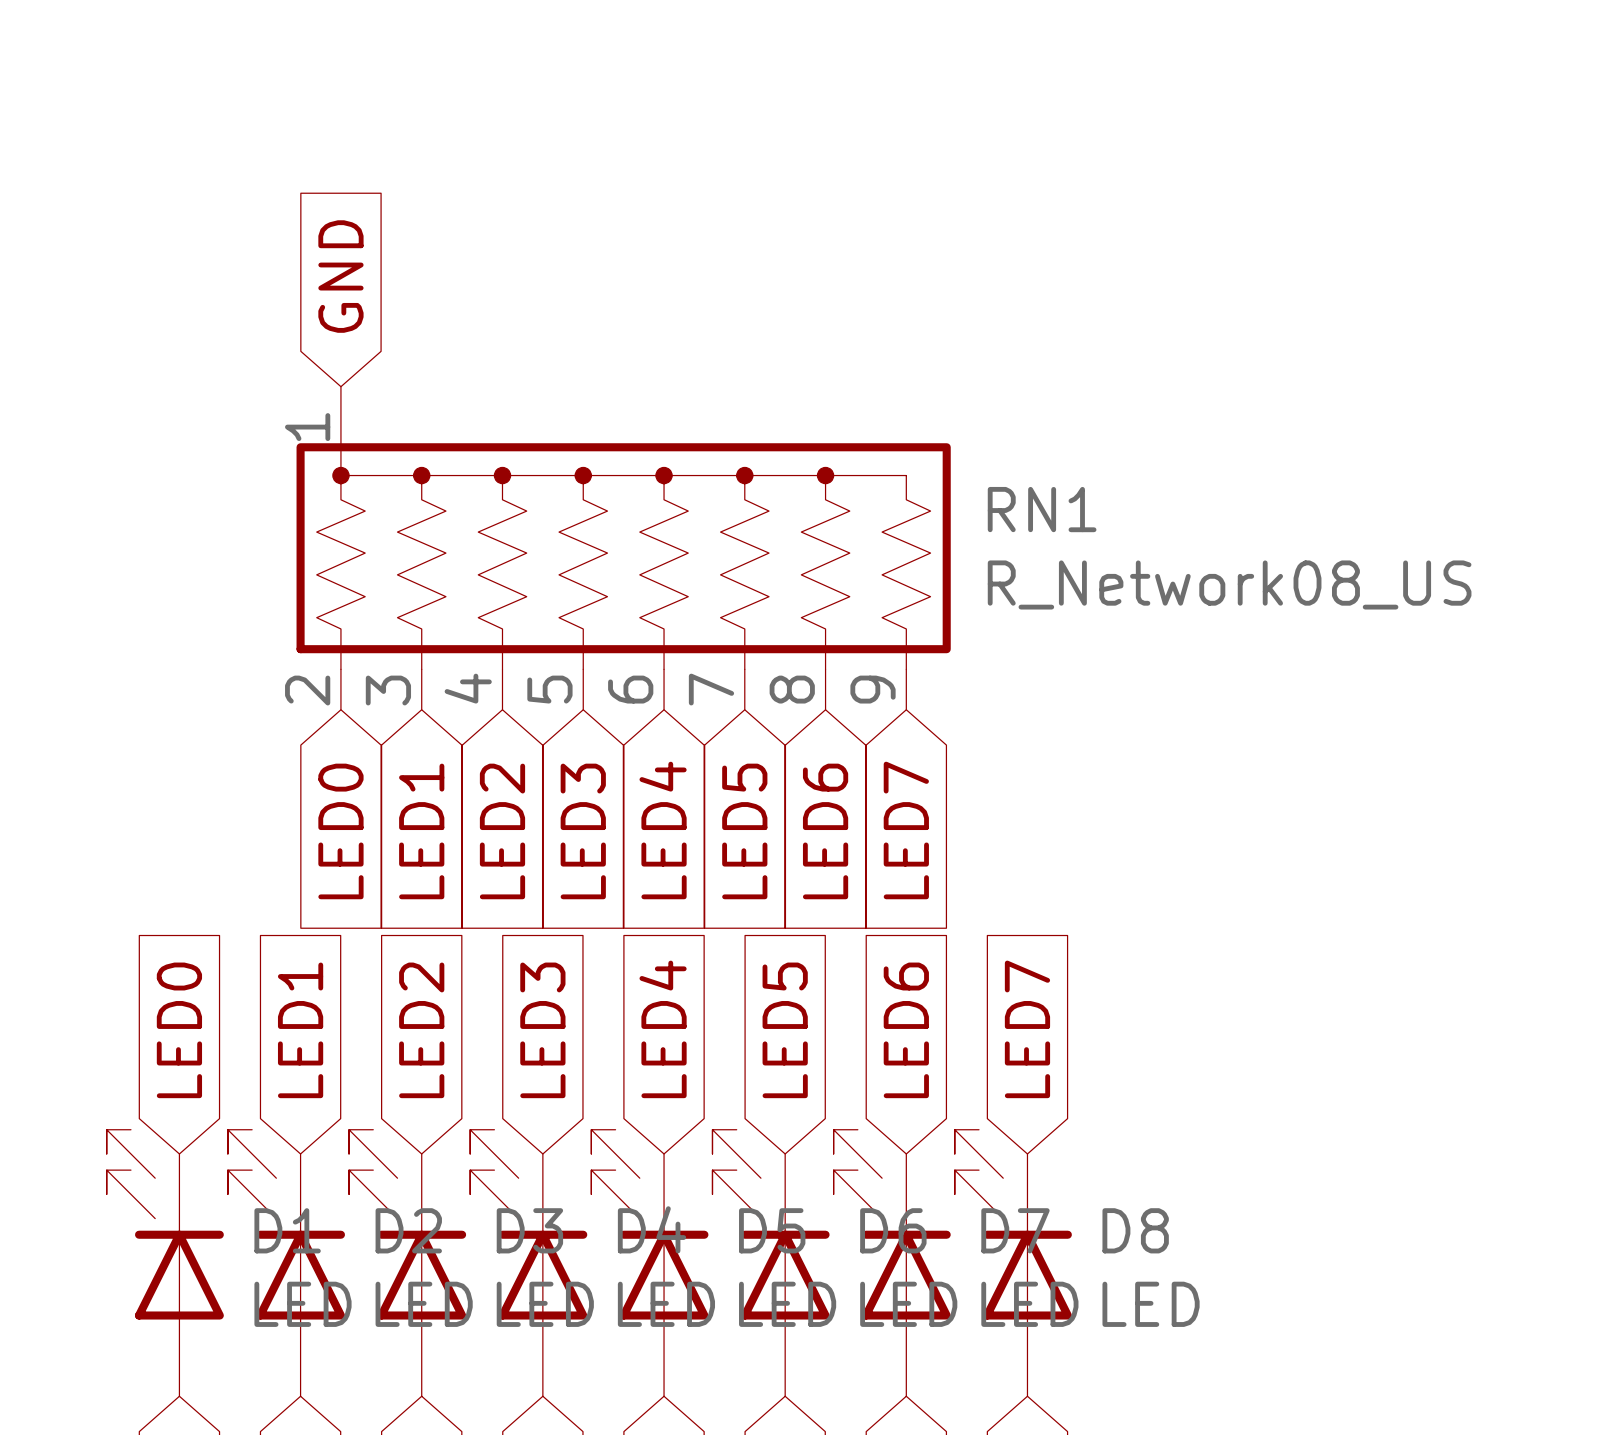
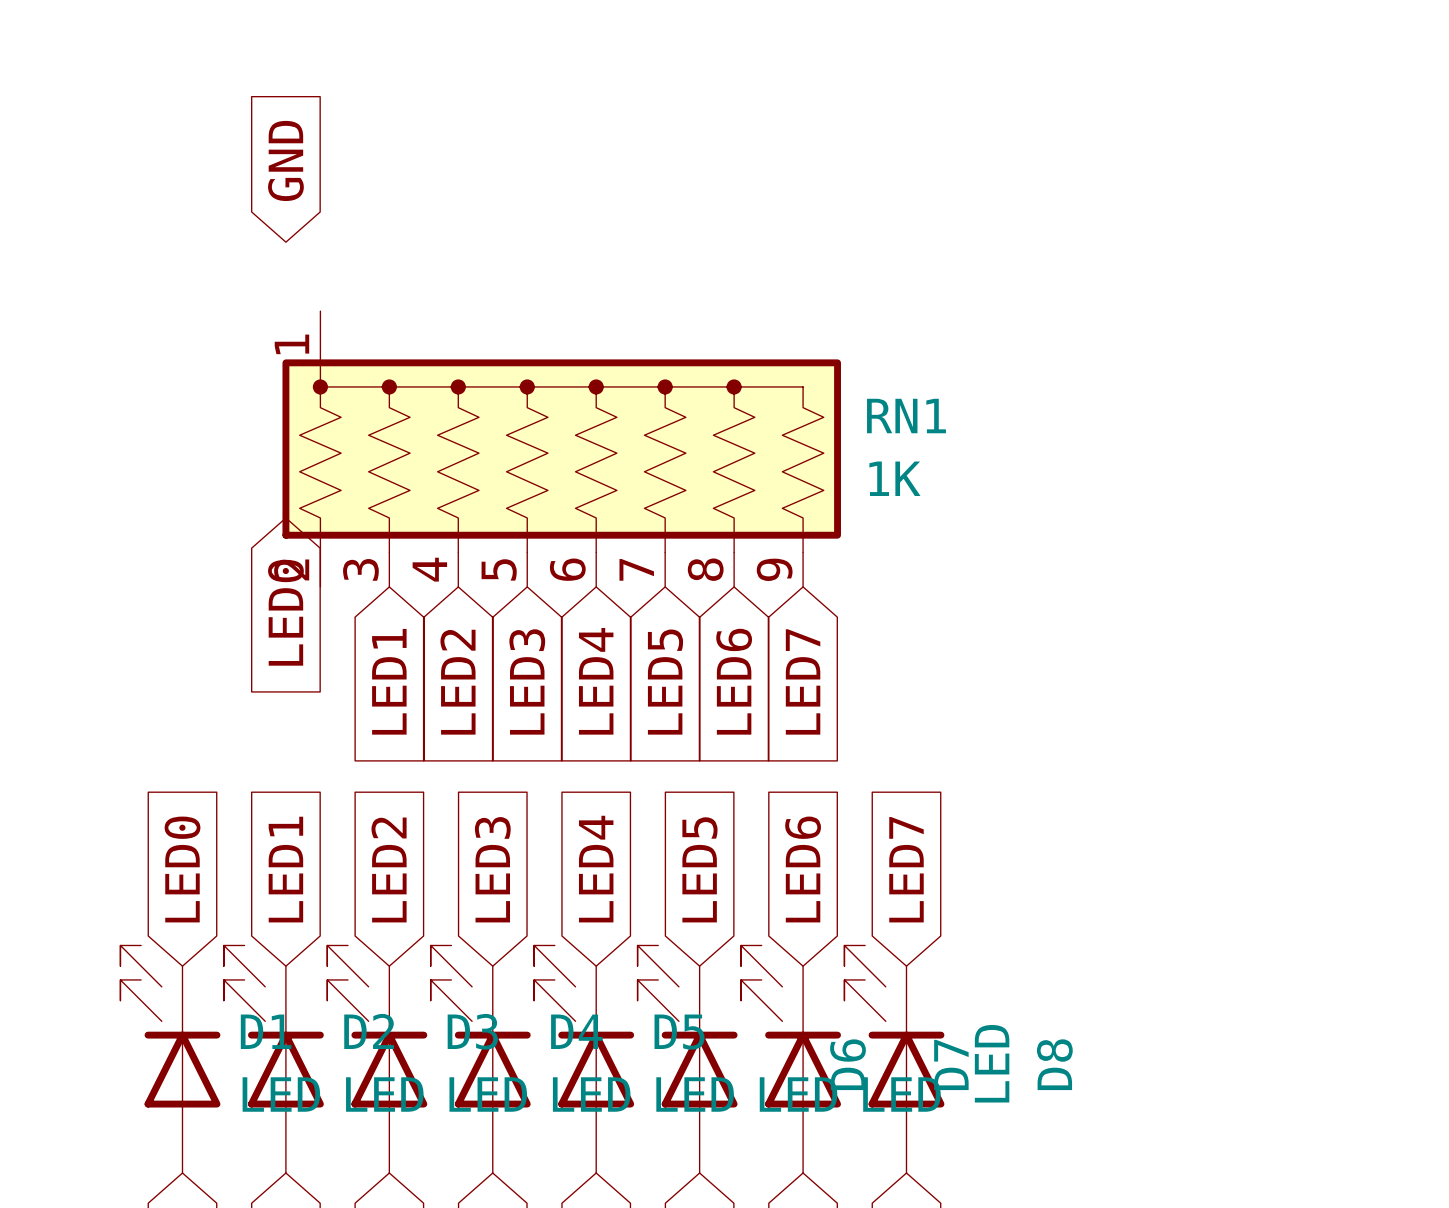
global label position: GND (340, 276) -> GND (285, 160)
RN1 value: R_Network08_US (1229, 584) -> 1K (894, 478)
global label position: LED0 (340, 831) -> LED0 (285, 612)
D6 name rotation: 0° (893, 1230) -> 90° counterclockwise (847, 1064)
D7 name rotation: 0° (1015, 1230) -> 90° counterclockwise (951, 1064)
D8 name rotation: 0° (1135, 1230) -> 90° counterclockwise (1054, 1064)
D8 value rotation: 0° (1151, 1304) -> 90° counterclockwise (992, 1063)

